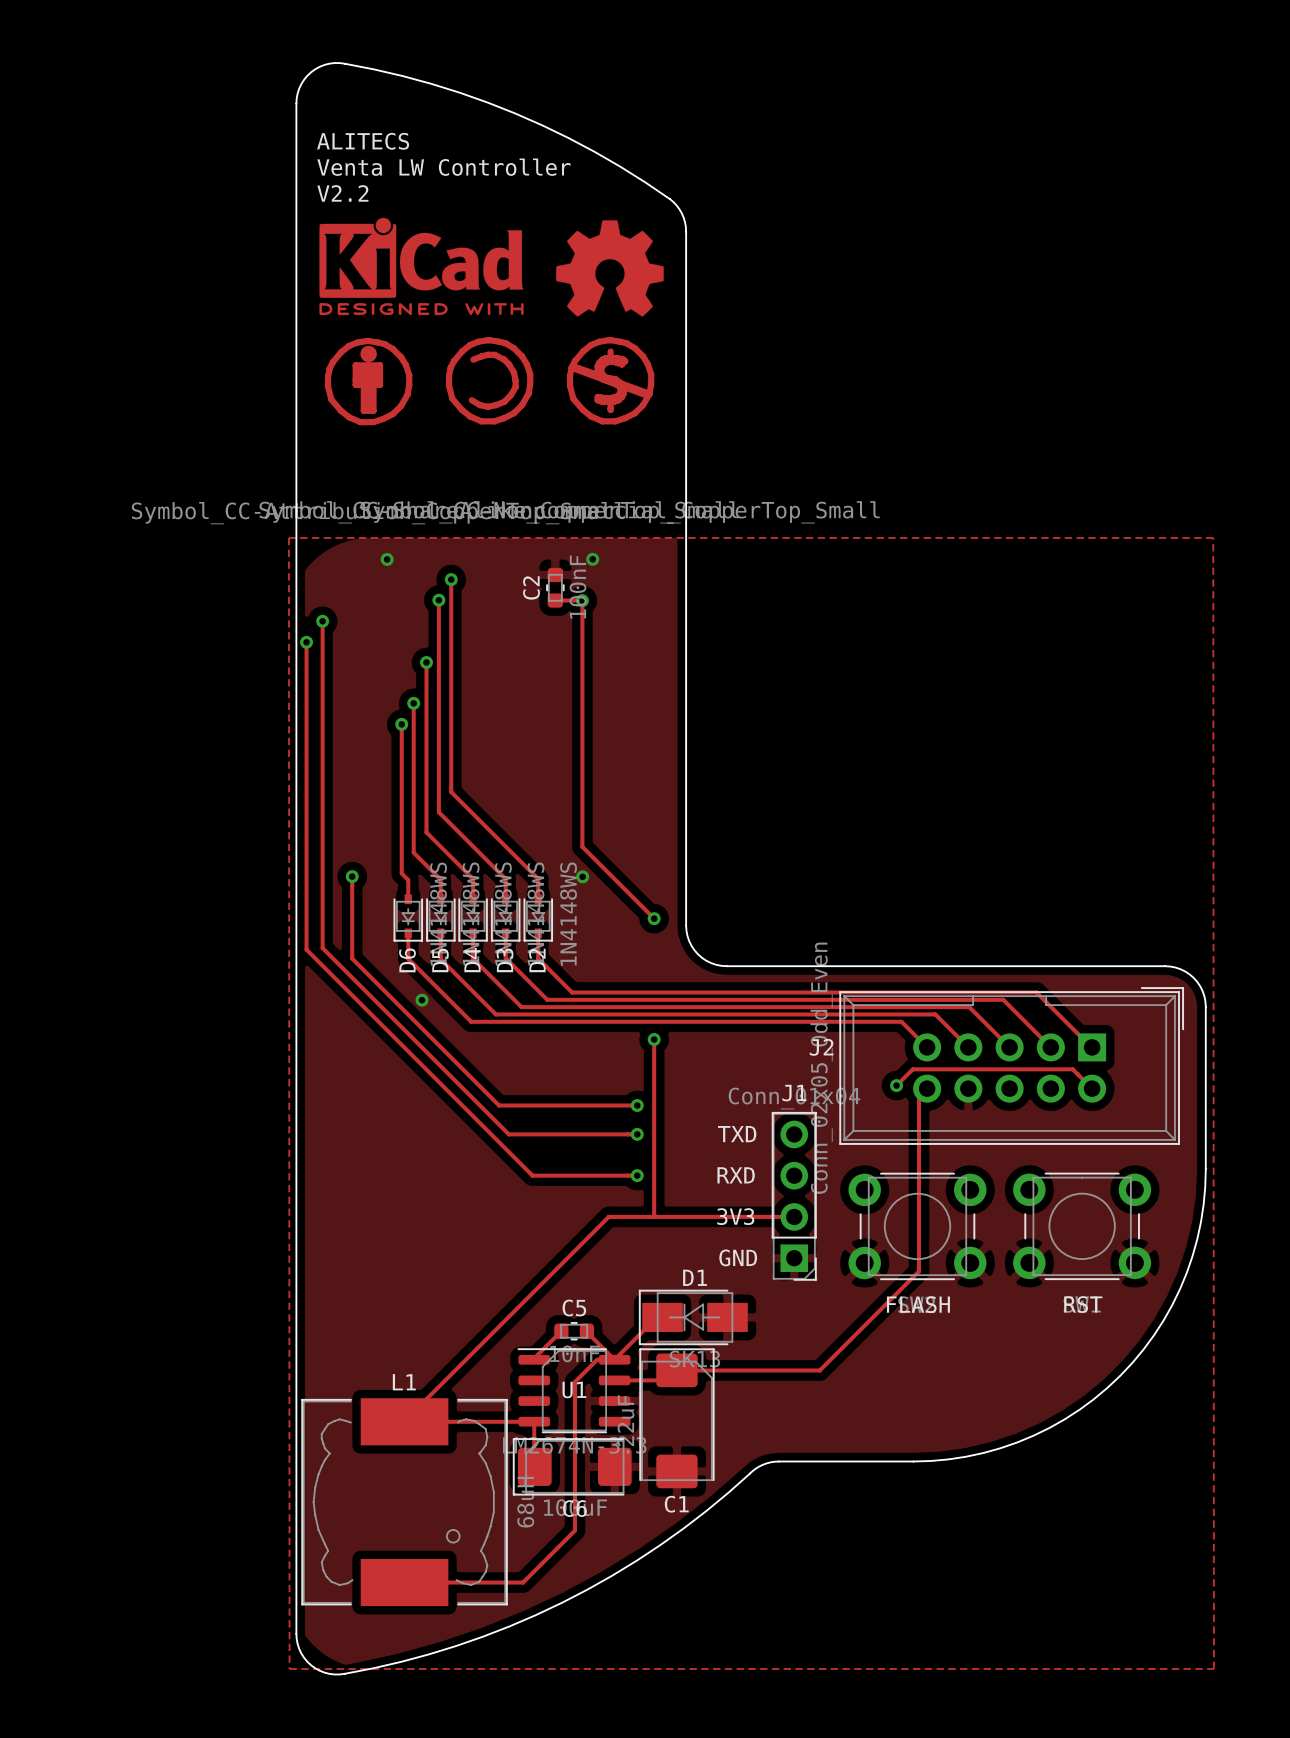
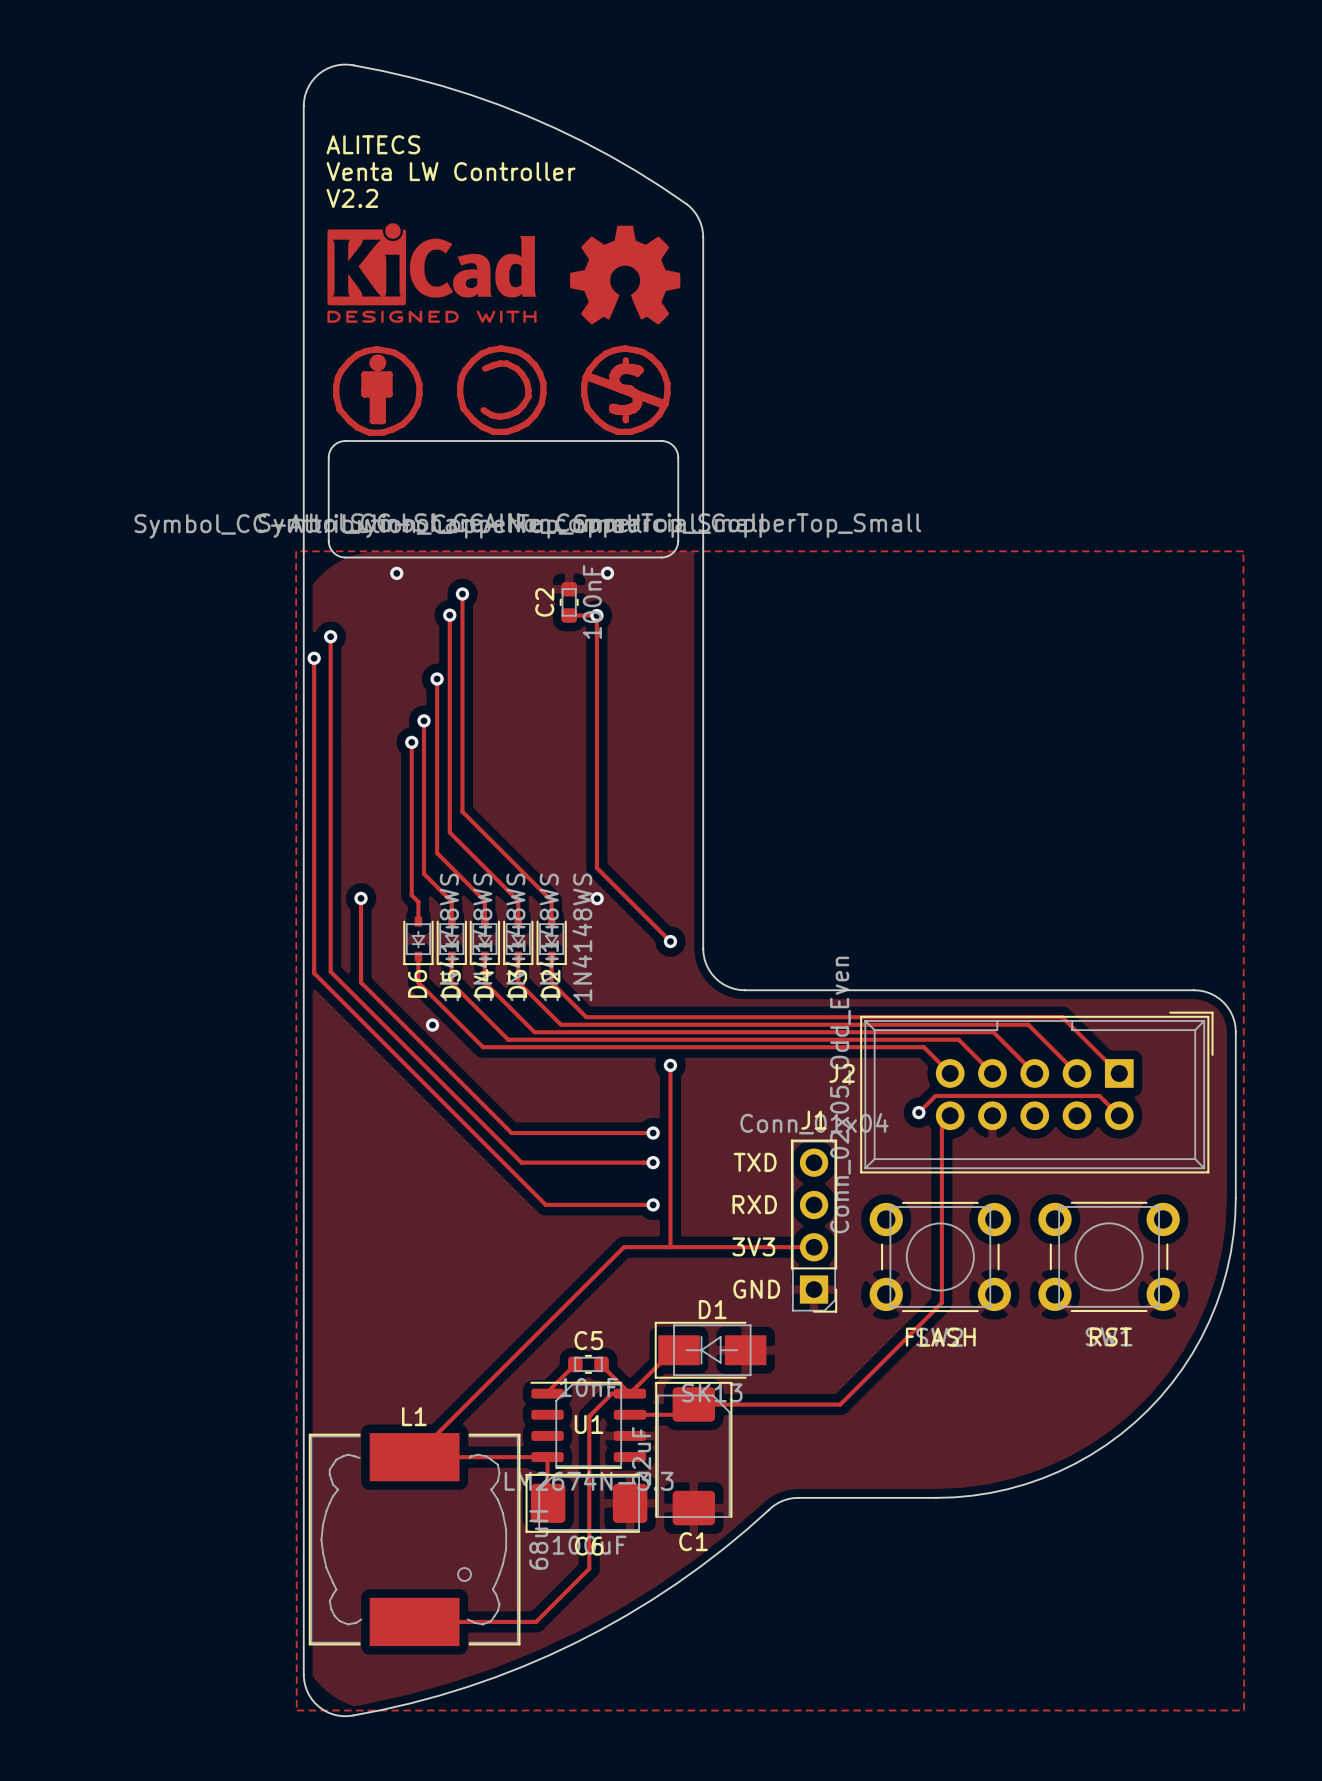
board edge: none -> (345, 441) (665, 441) (674, 447) (678, 455) (677, 545) (671, 554) (661, 557) (341, 556) (333, 552) (328, 543) (328, 457) (333, 445) (345, 441)

